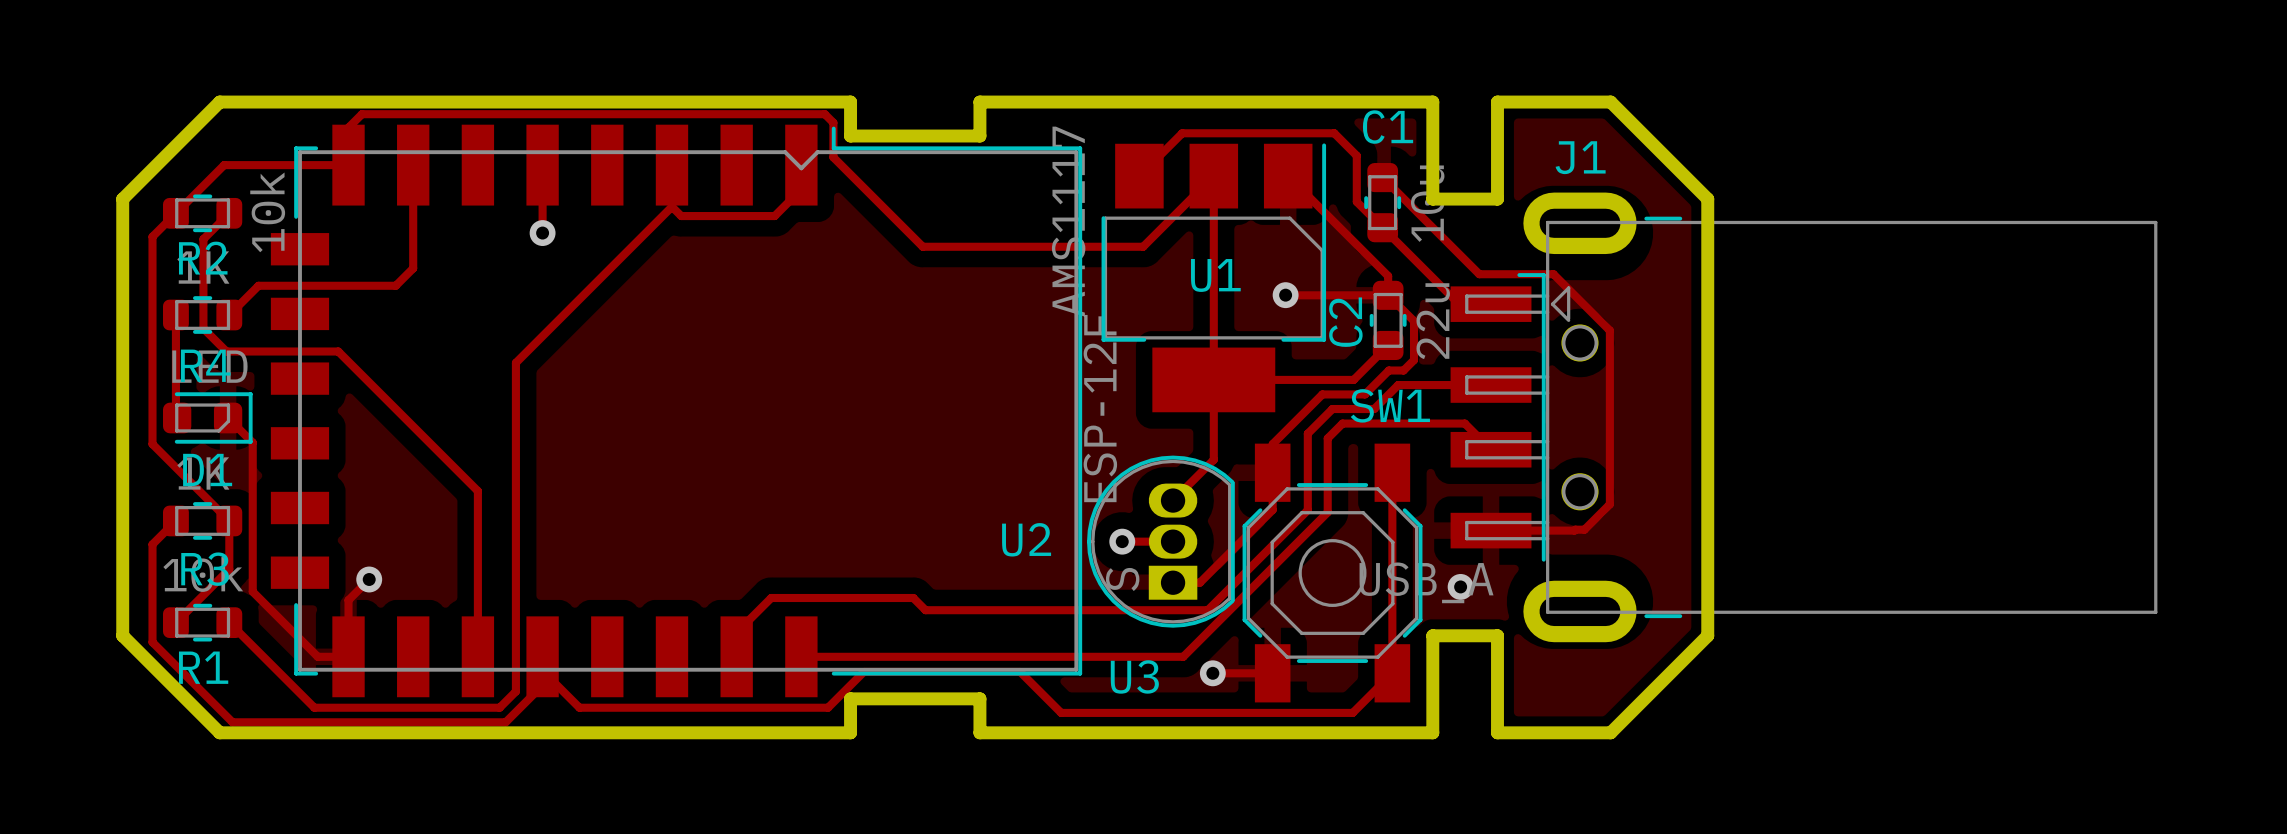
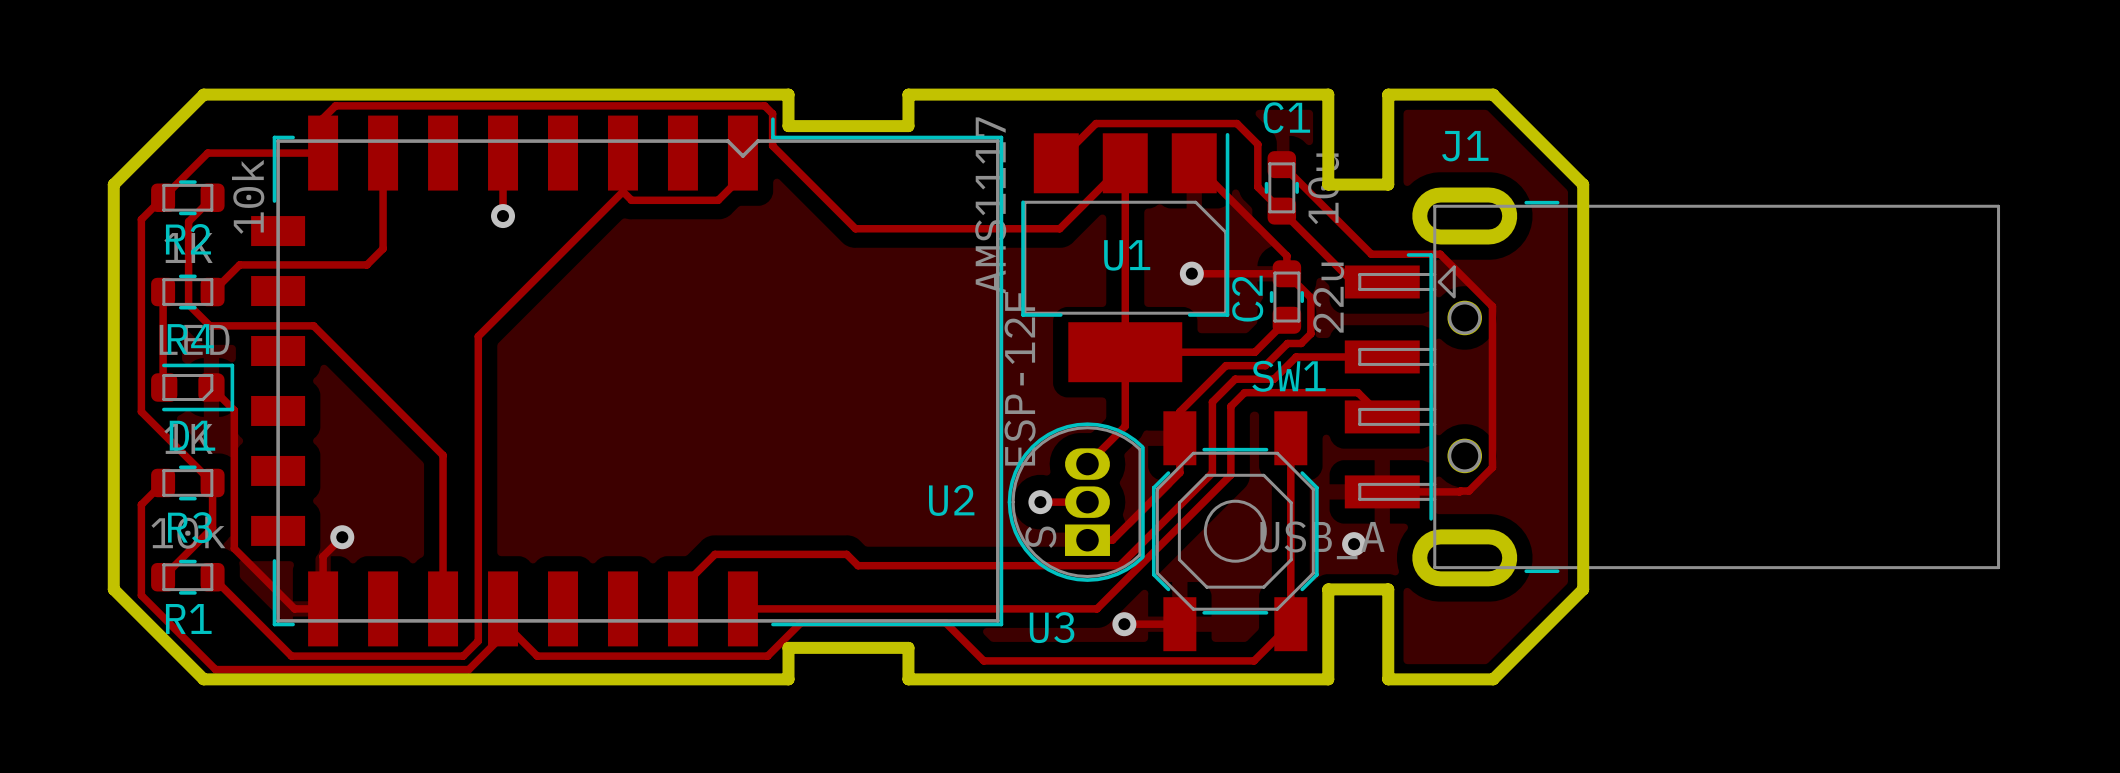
J1 footprint: [1450, 192, 2158, 643] -> [1344, 187, 2001, 587]

